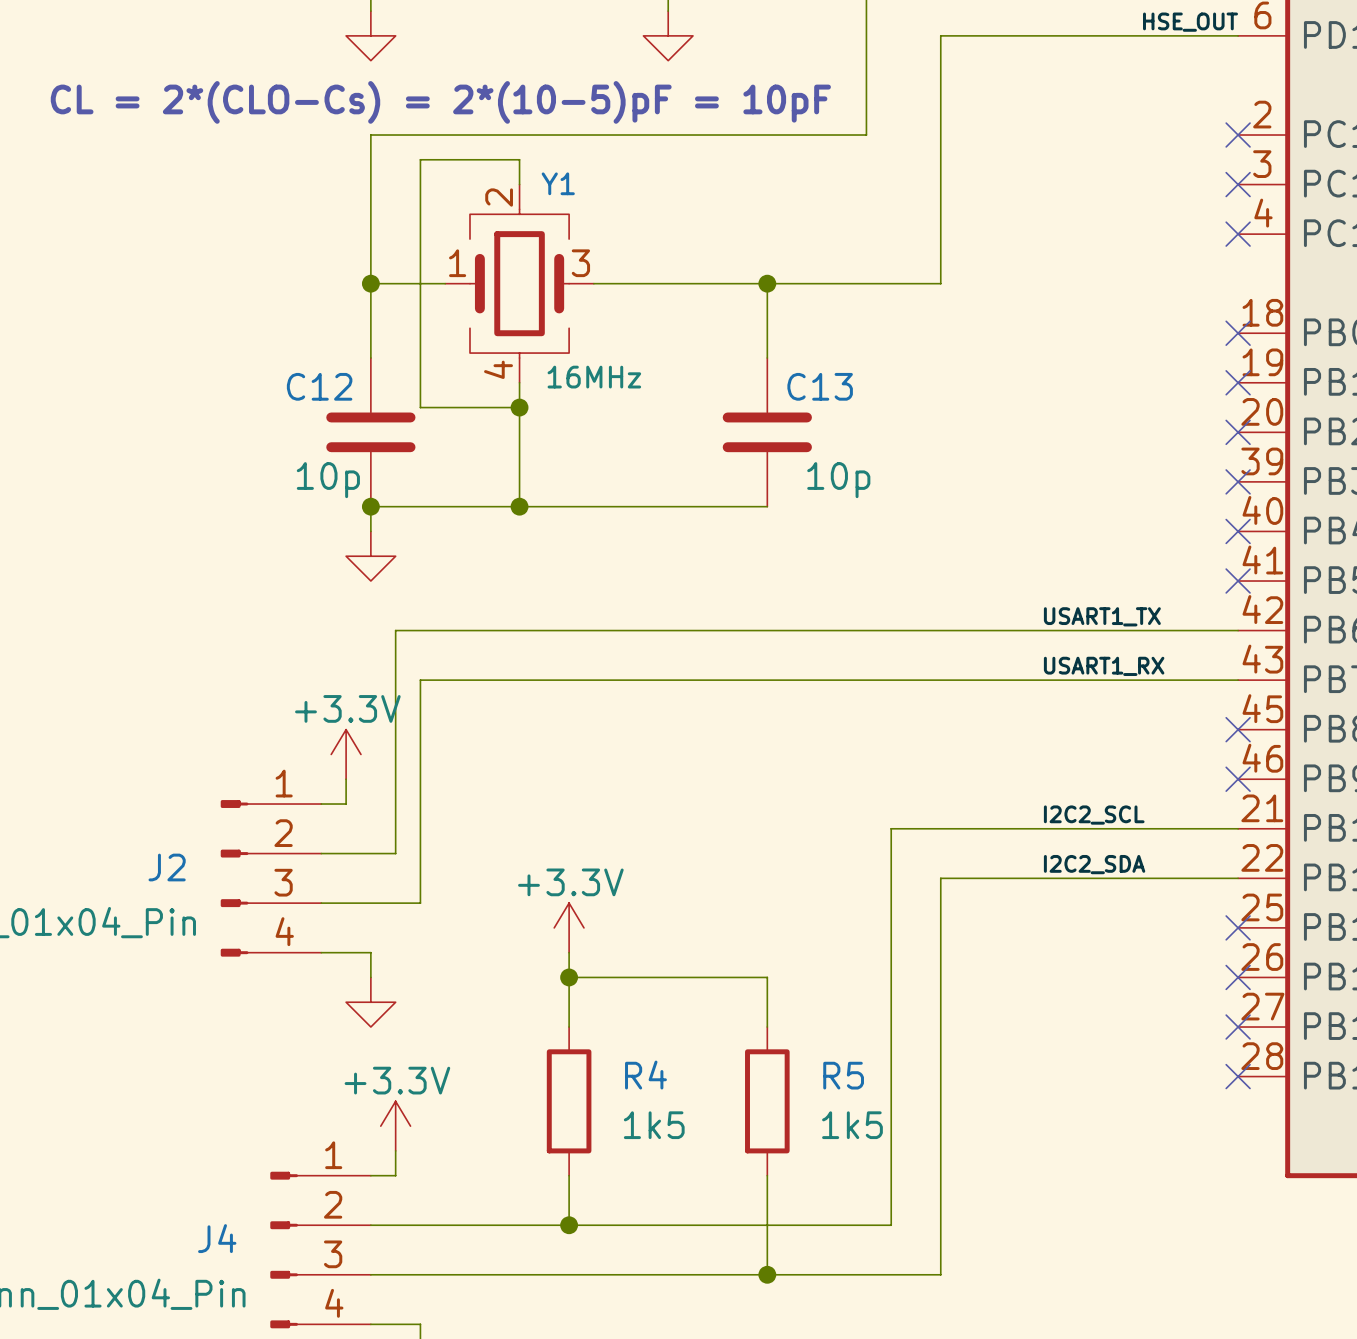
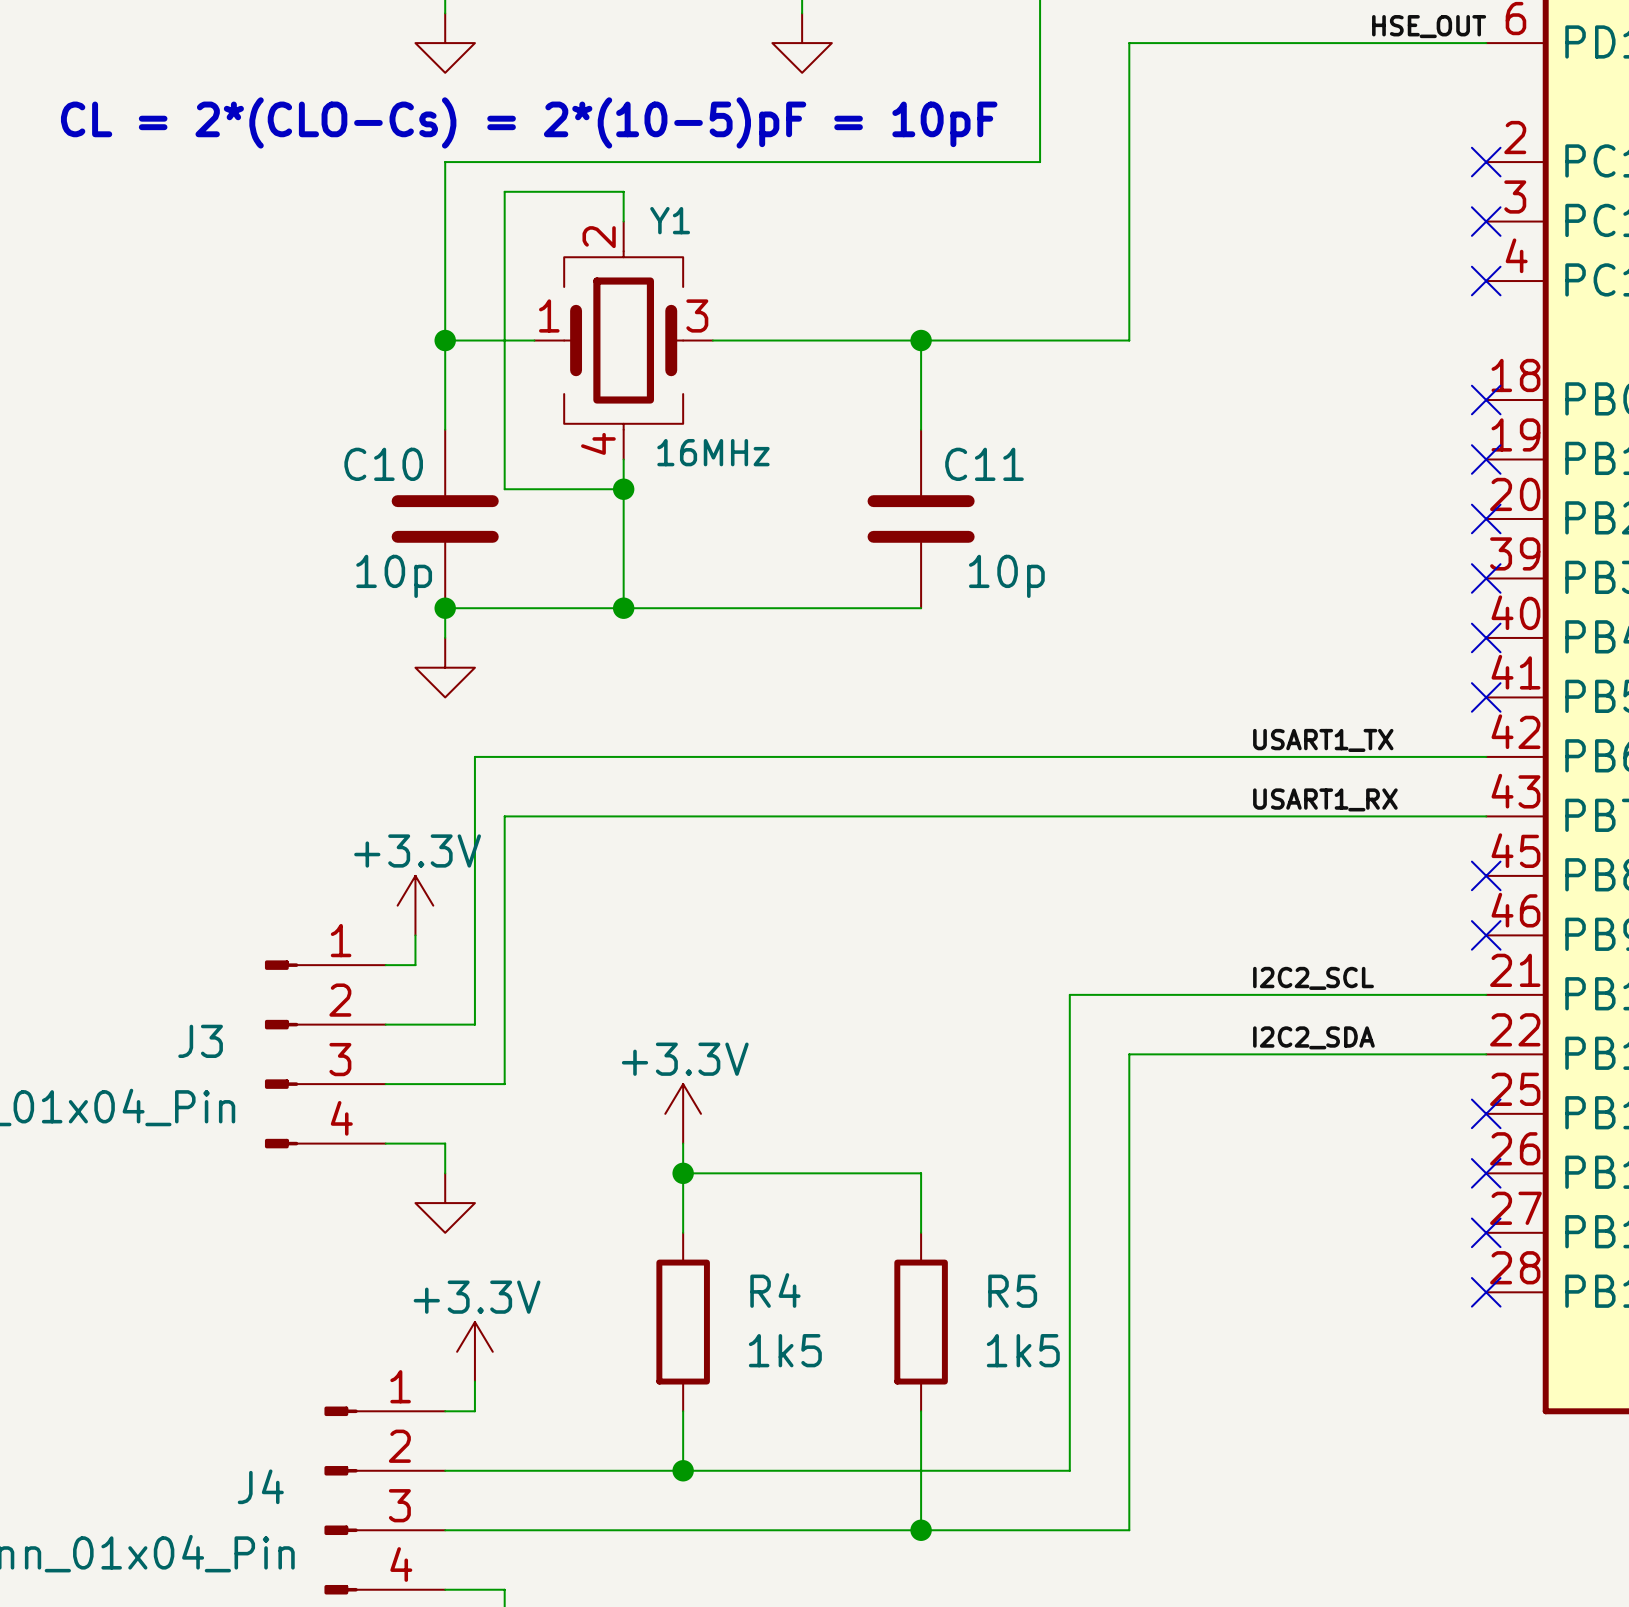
C12 name: C12 (319, 386) -> C10 (383, 464)
C13 name: C13 (820, 386) -> C11 (984, 464)
J2 name: J2 (167, 867) -> J3 (200, 1041)

